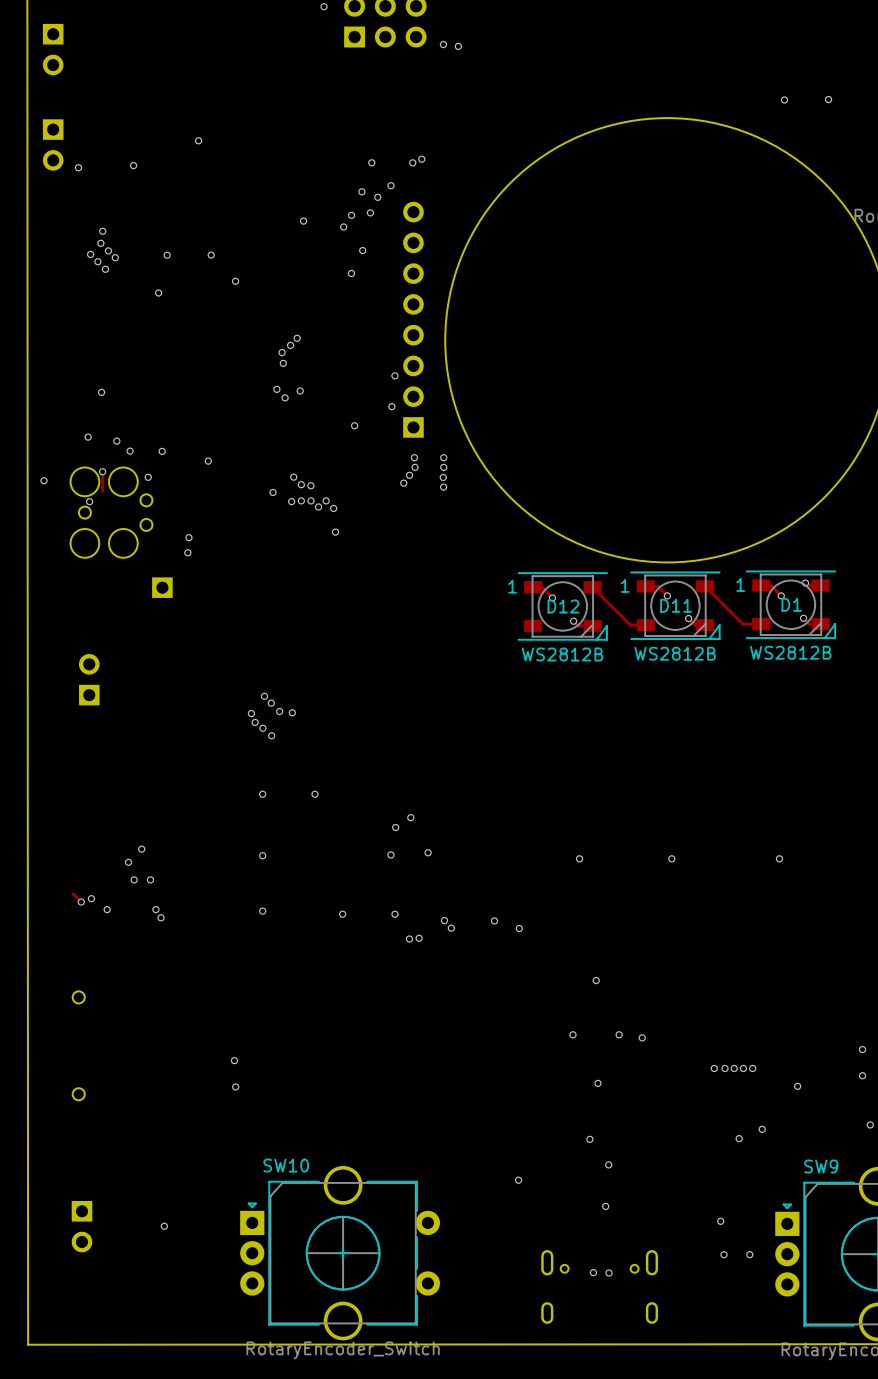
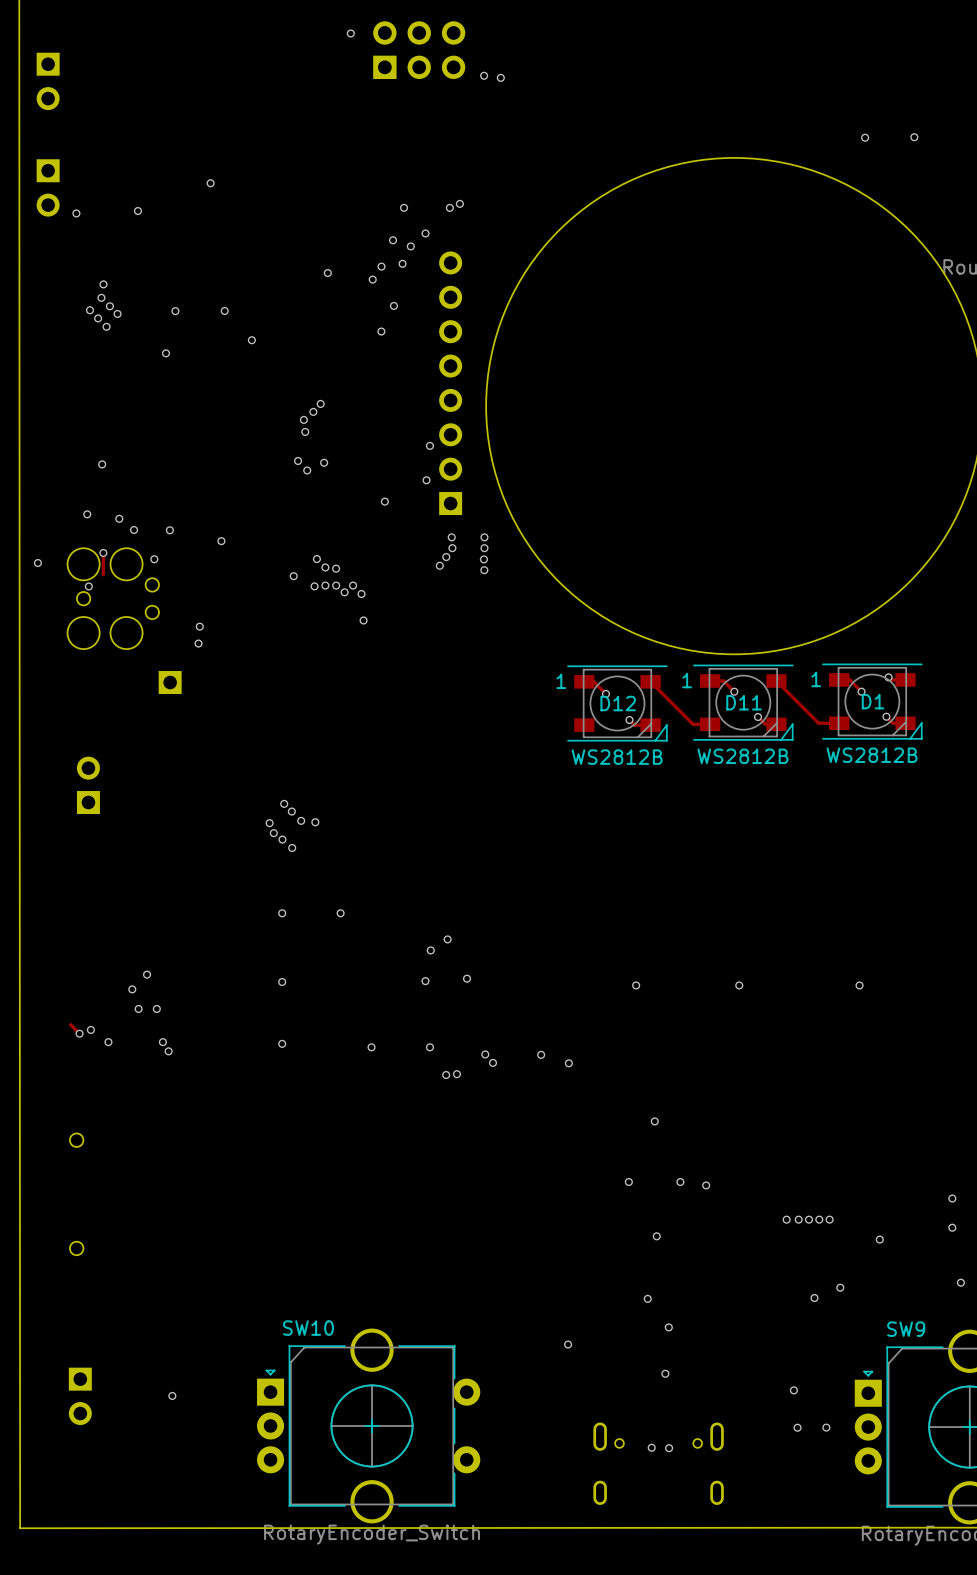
via: (234, 1060) -> none
via: (235, 1087) -> none

